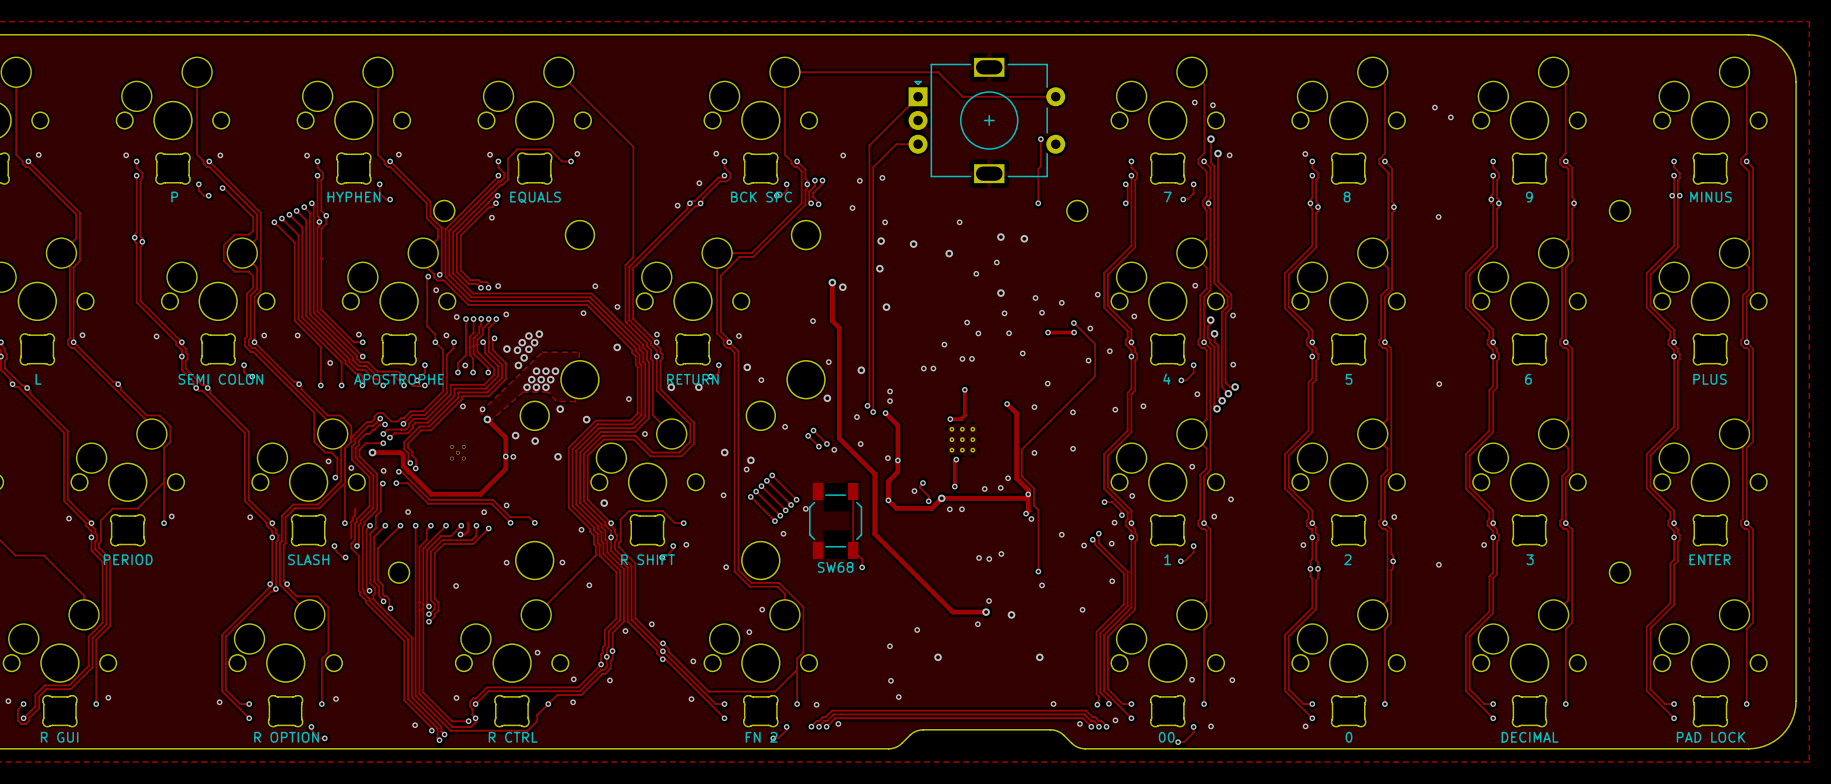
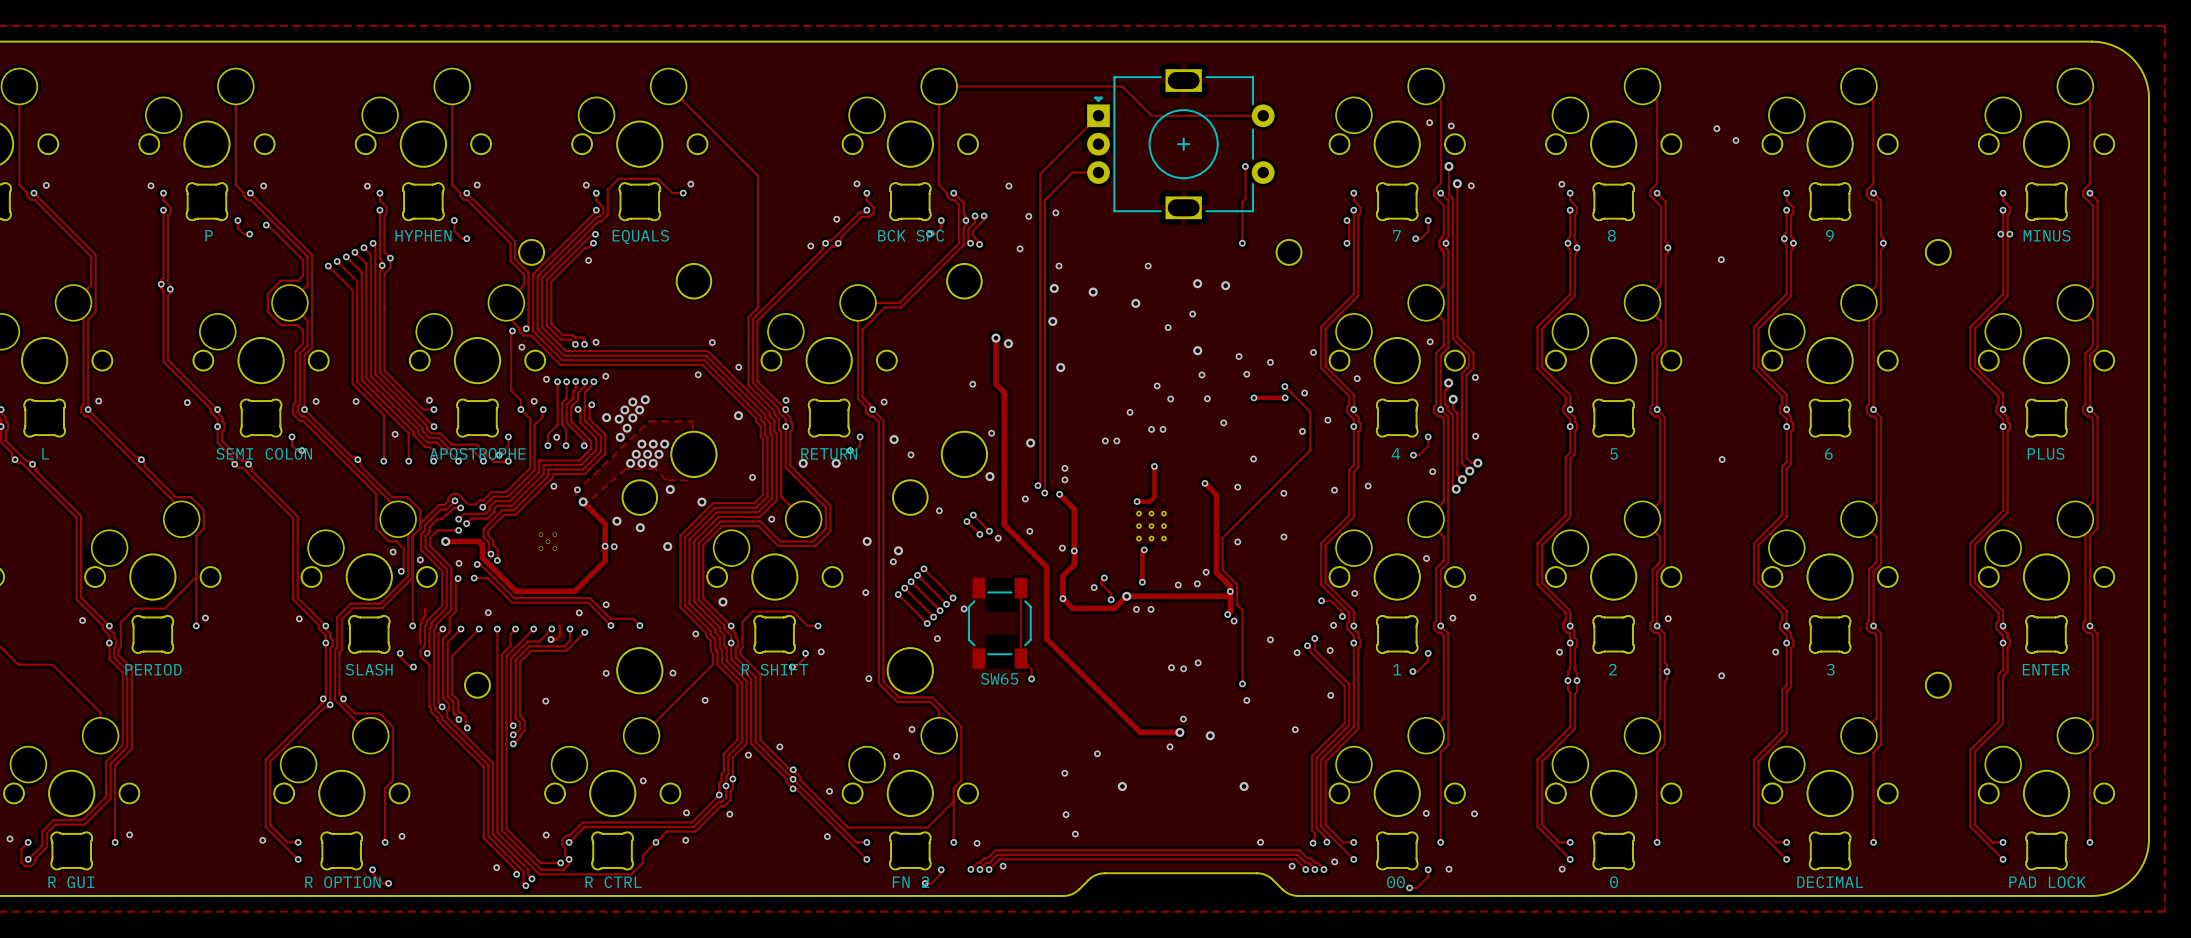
SW68 name: SW68 (835, 567) -> SW65 (999, 678)

